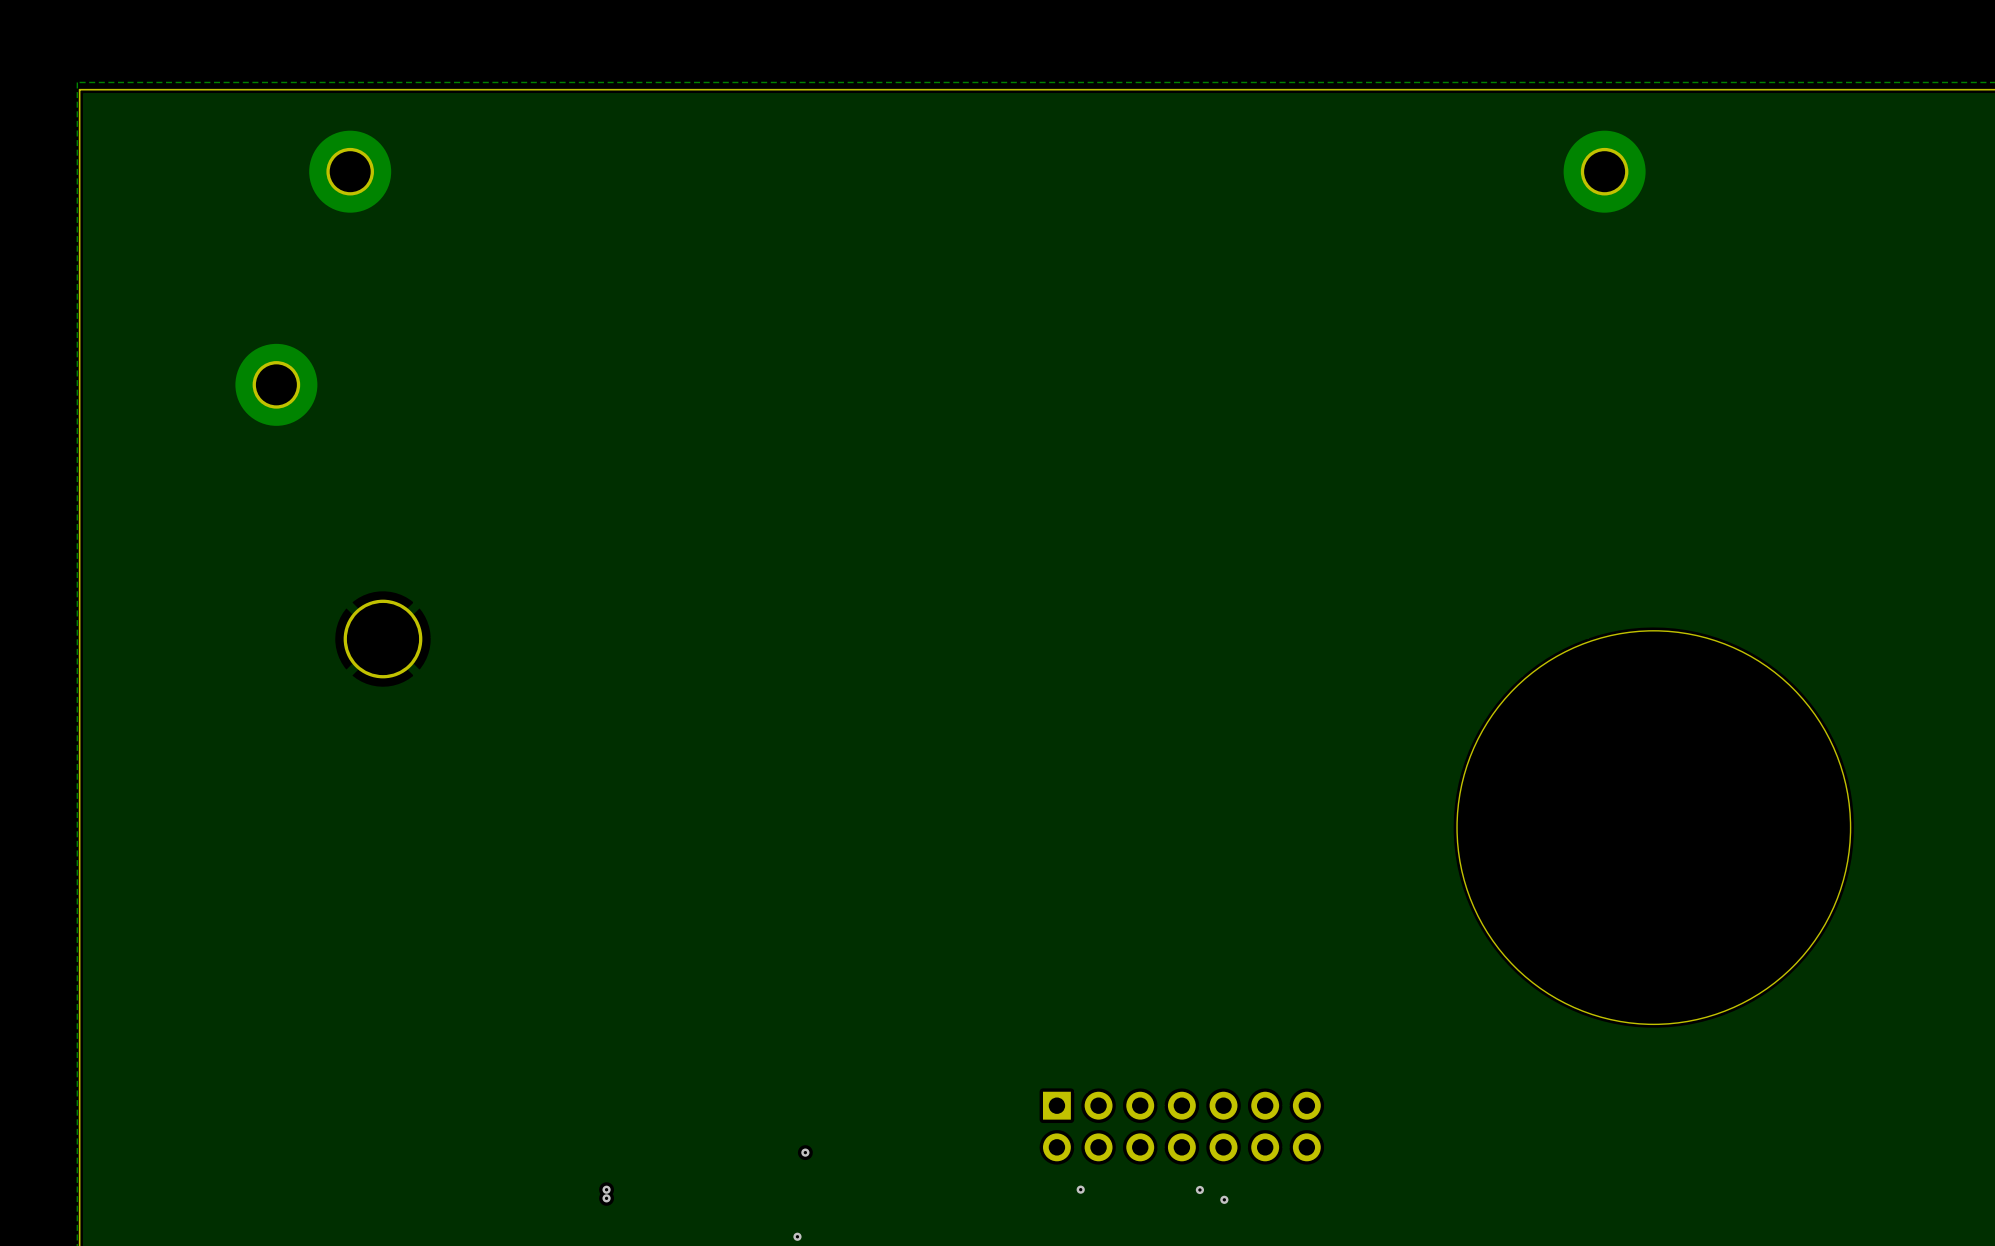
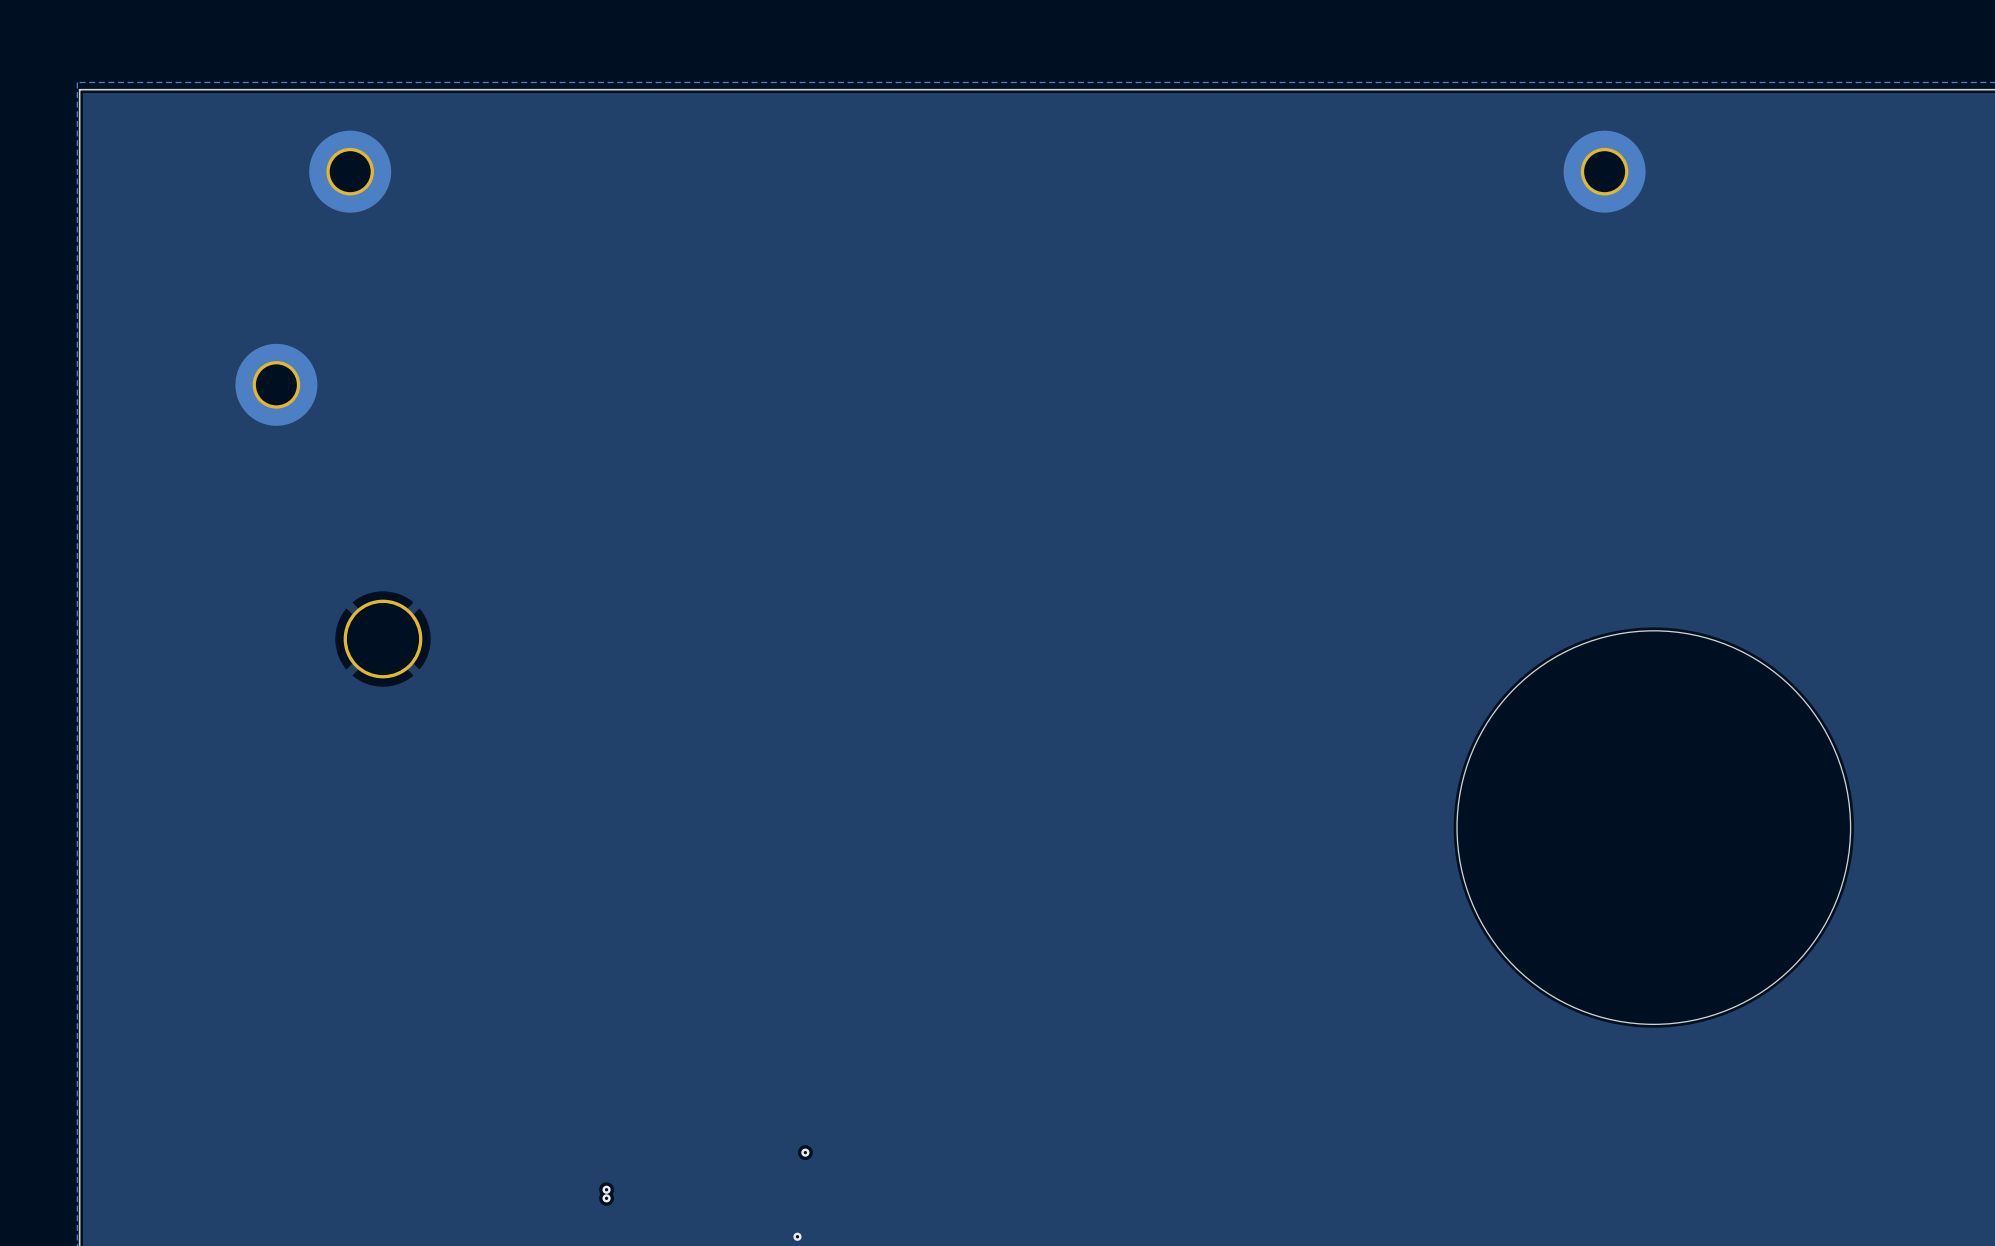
part: (1181, 1126) -> none
via: (1080, 1189) -> none
via: (1199, 1189) -> none
via: (1224, 1199) -> none

